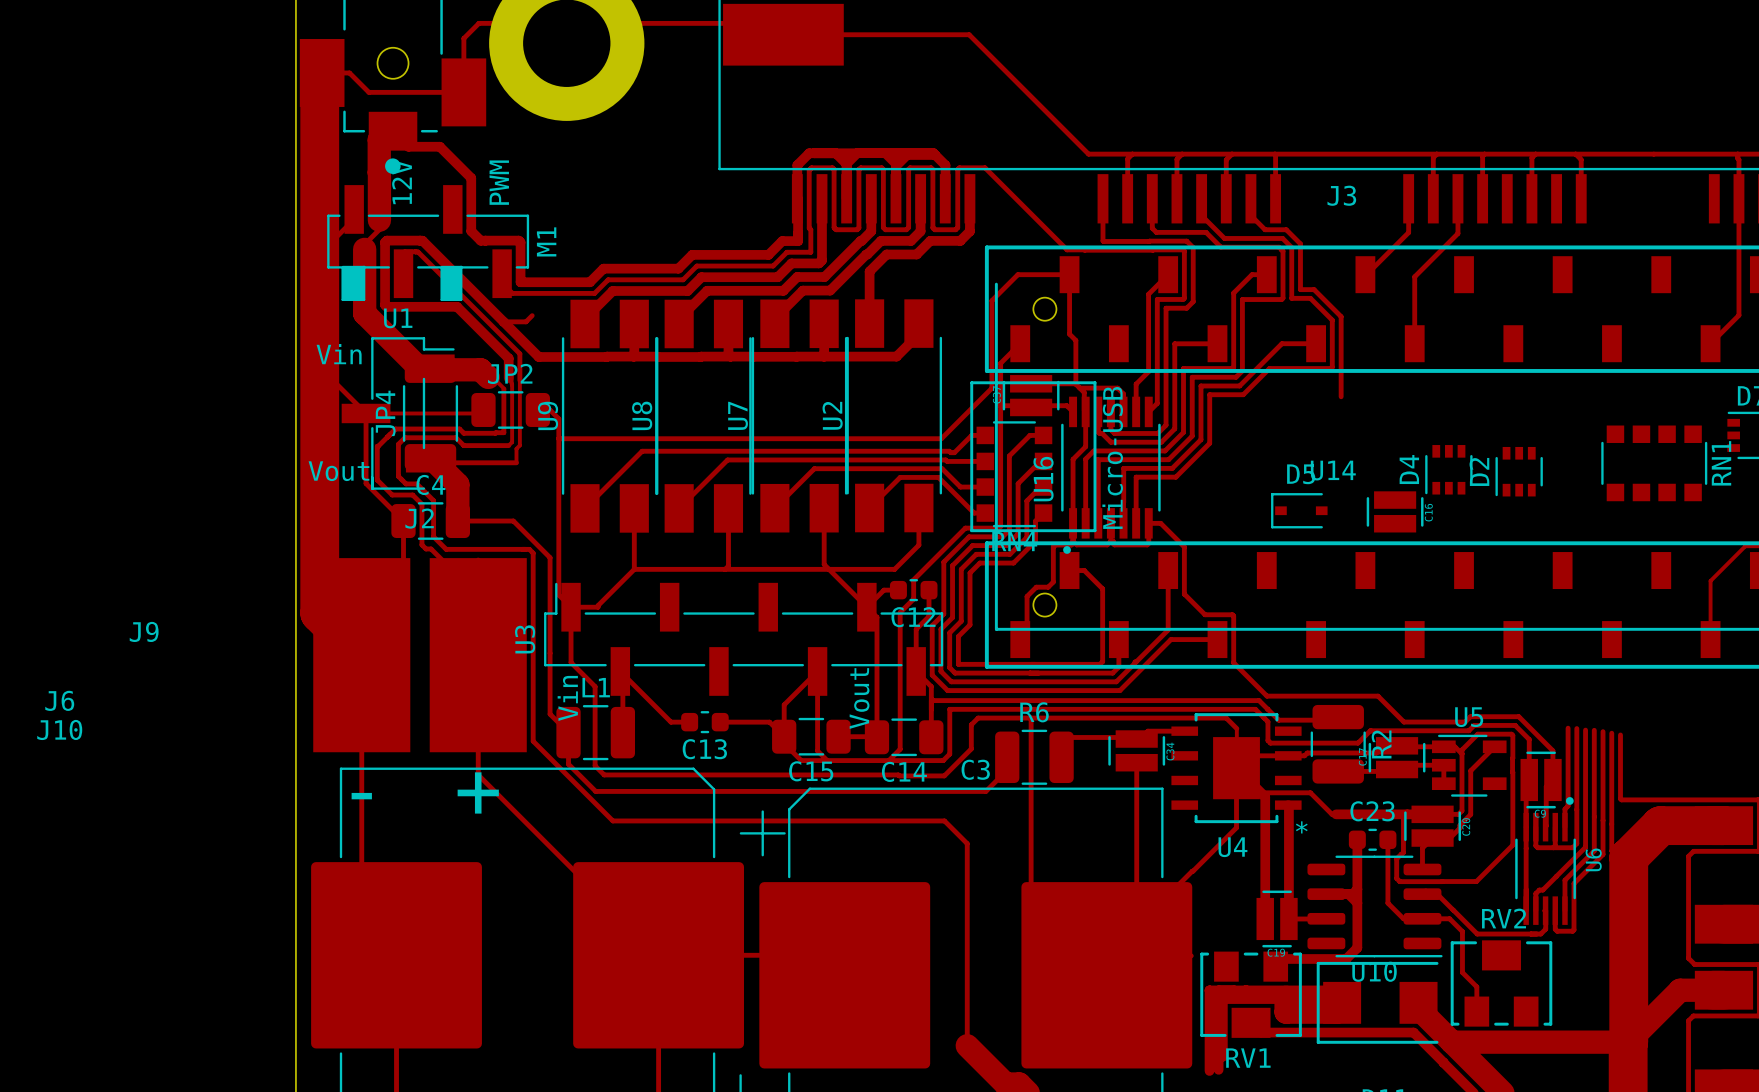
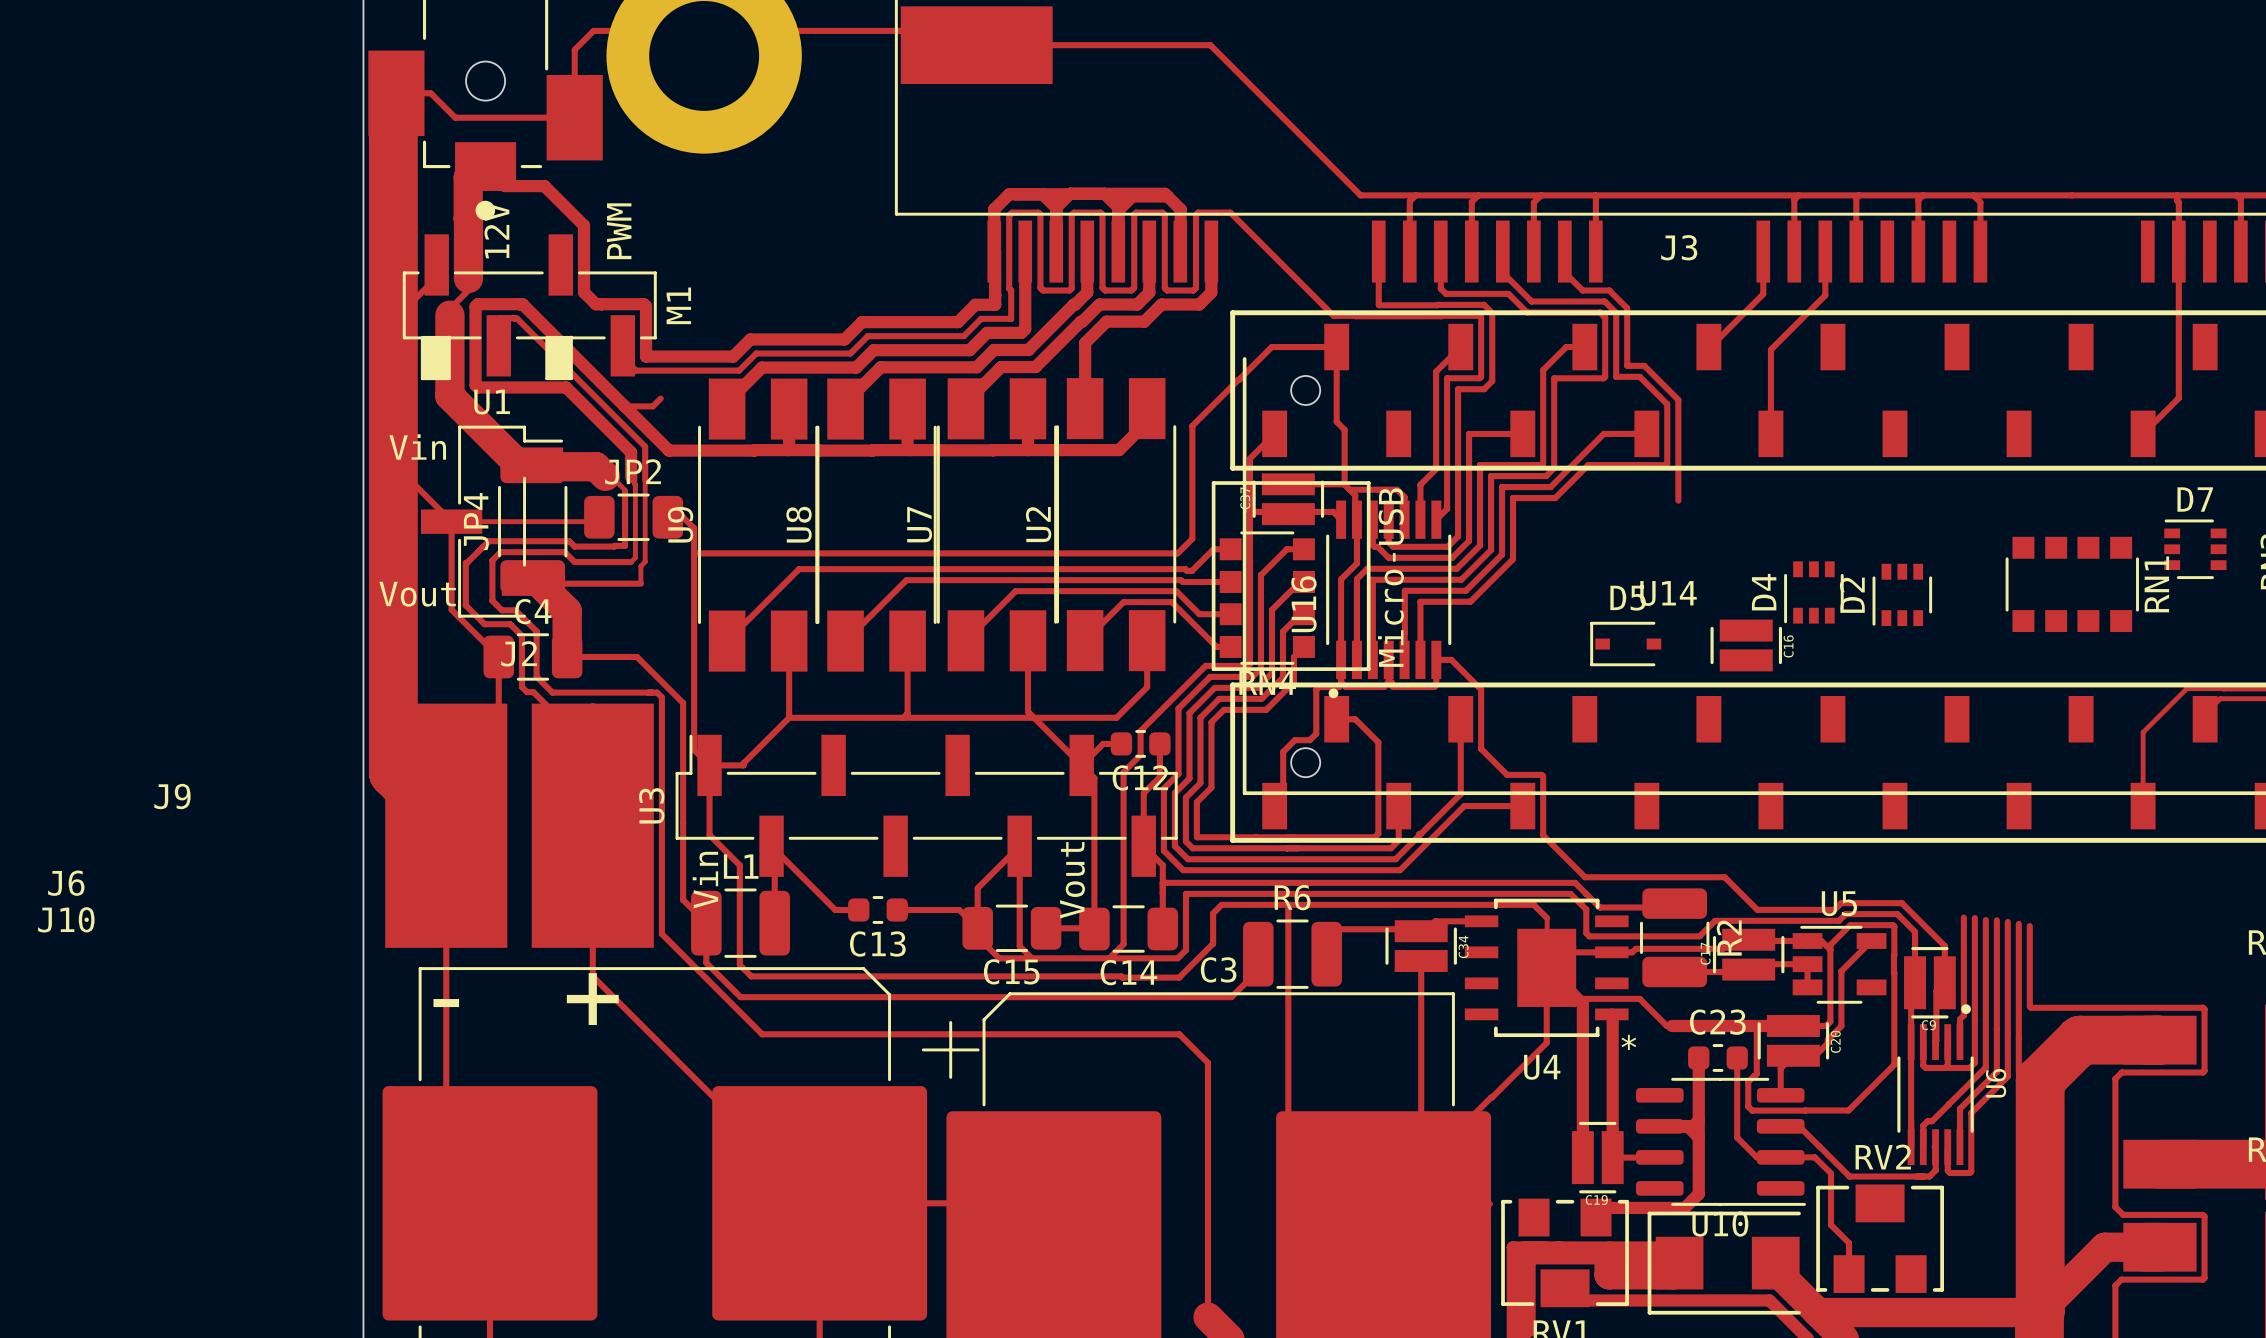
track: (991, 300) (991, 388) (941, 438) -> (1239, 379) (1192, 425) (1192, 538) (1175, 553)

